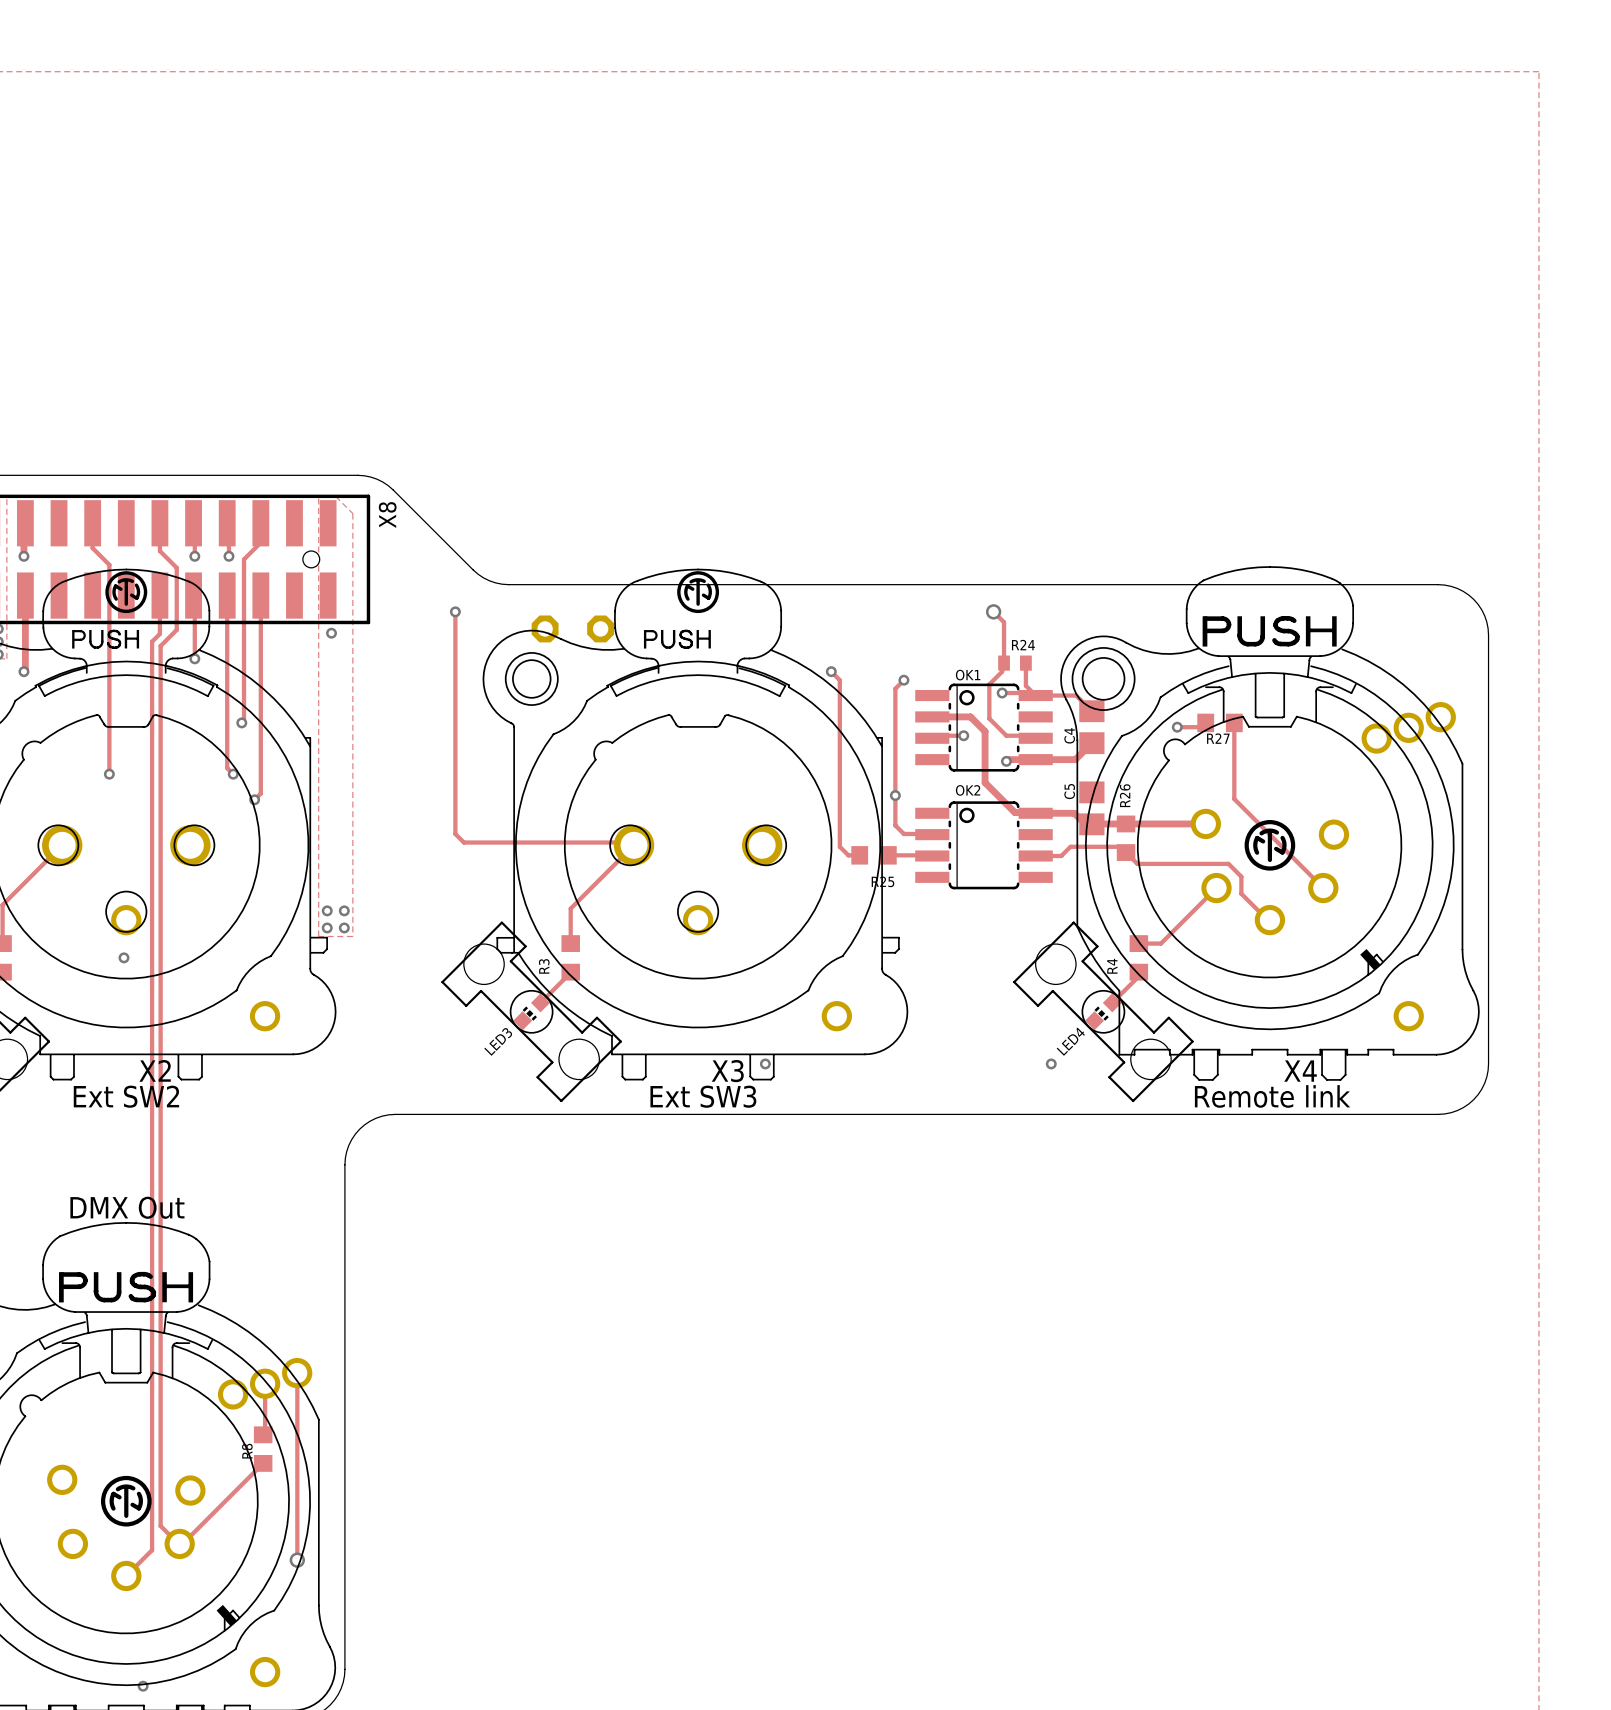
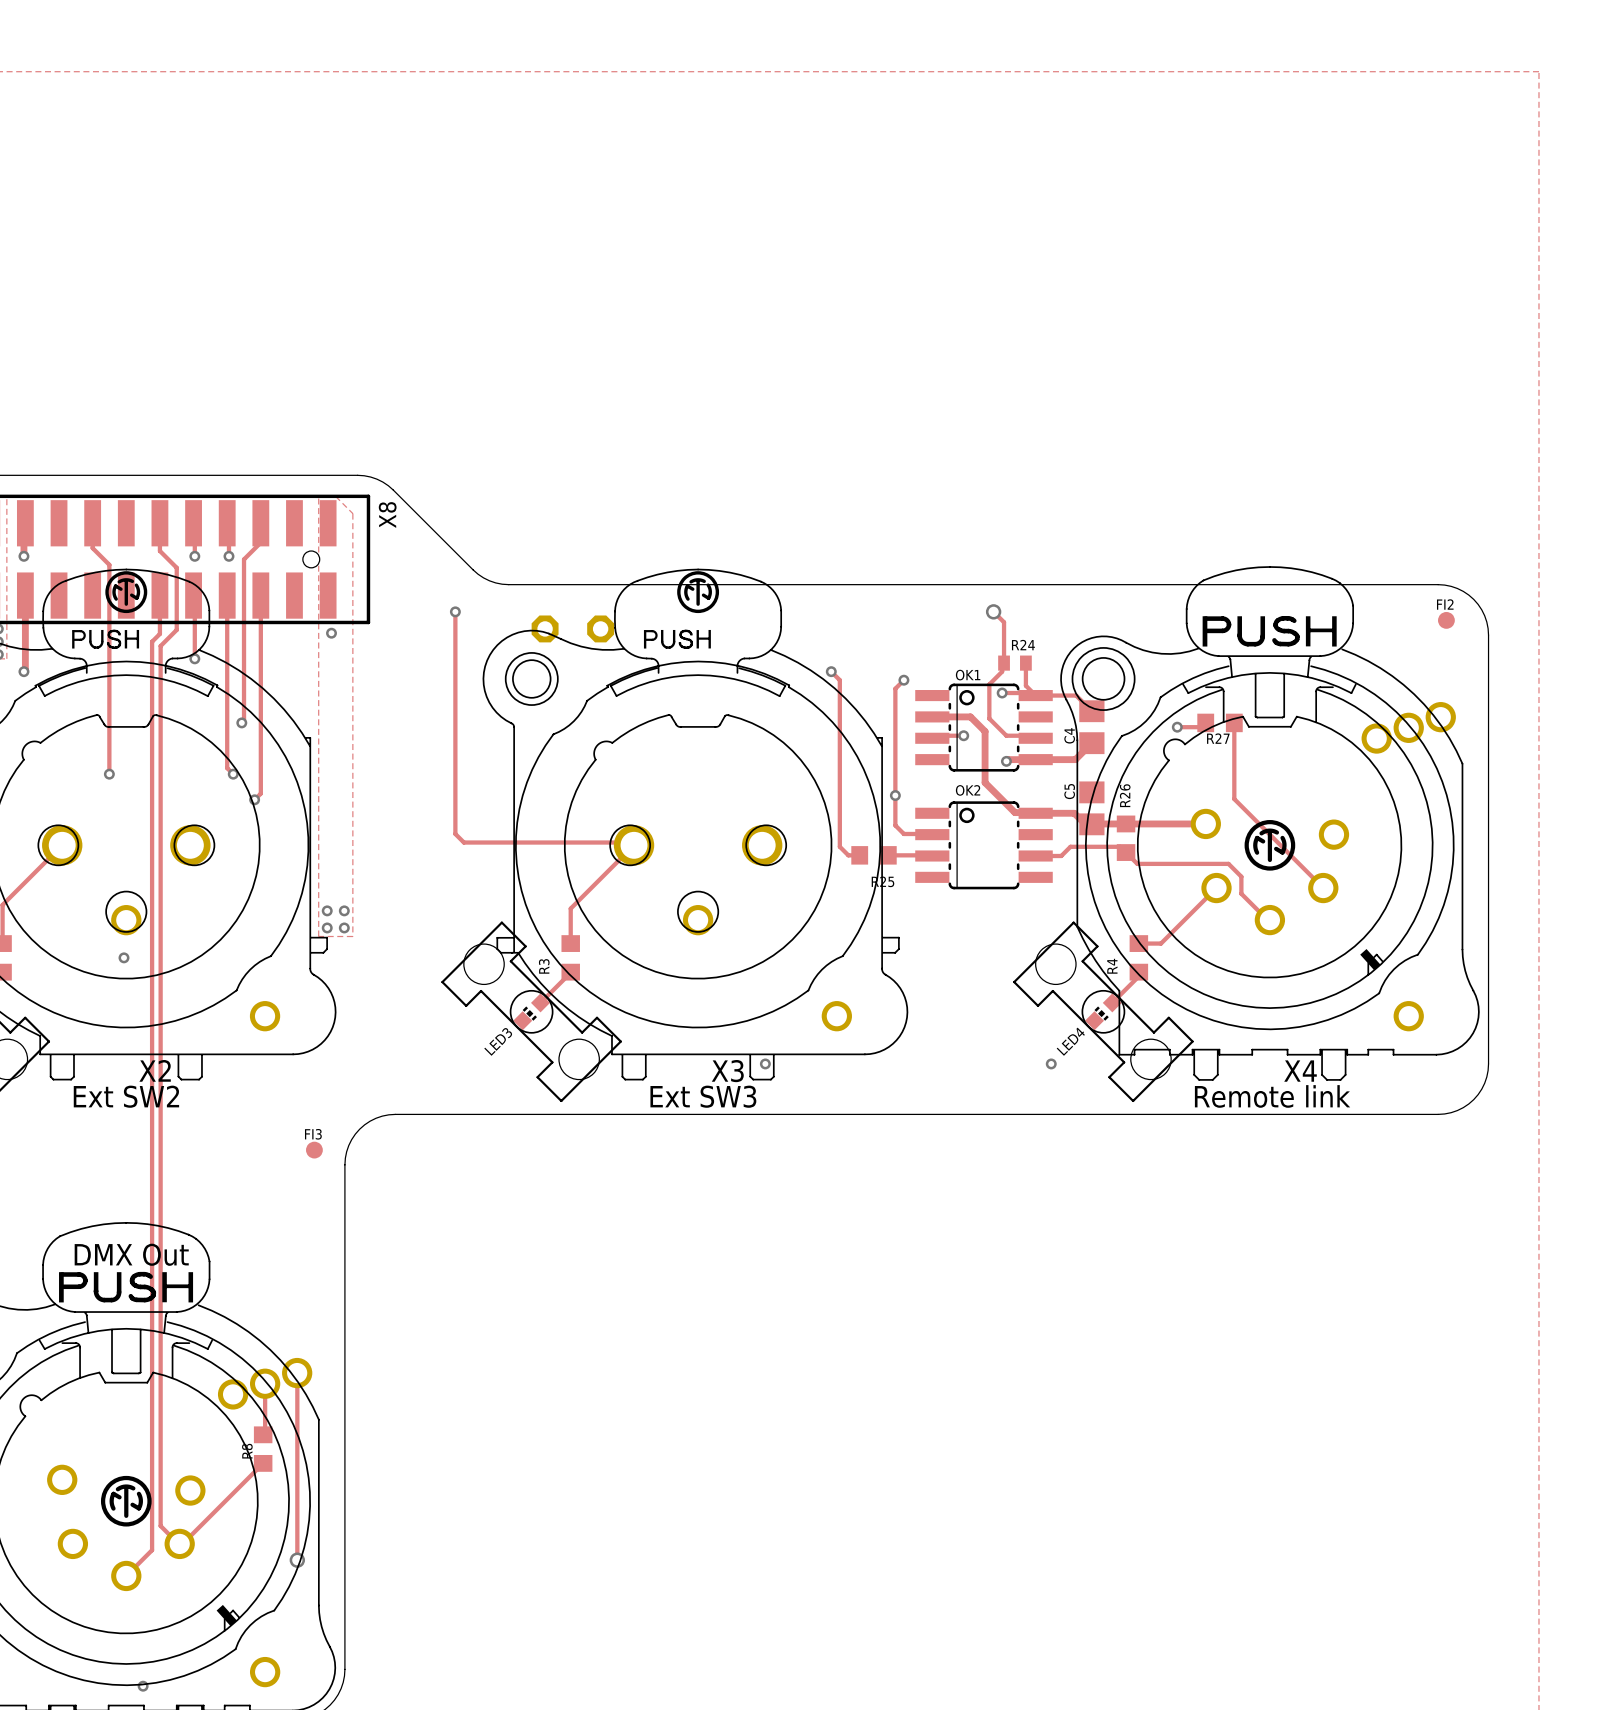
FI2: none -> (1446, 620)
FI3: none -> (314, 1150)
text position: DMX Out (127, 1207) -> DMX Out (131, 1254)

